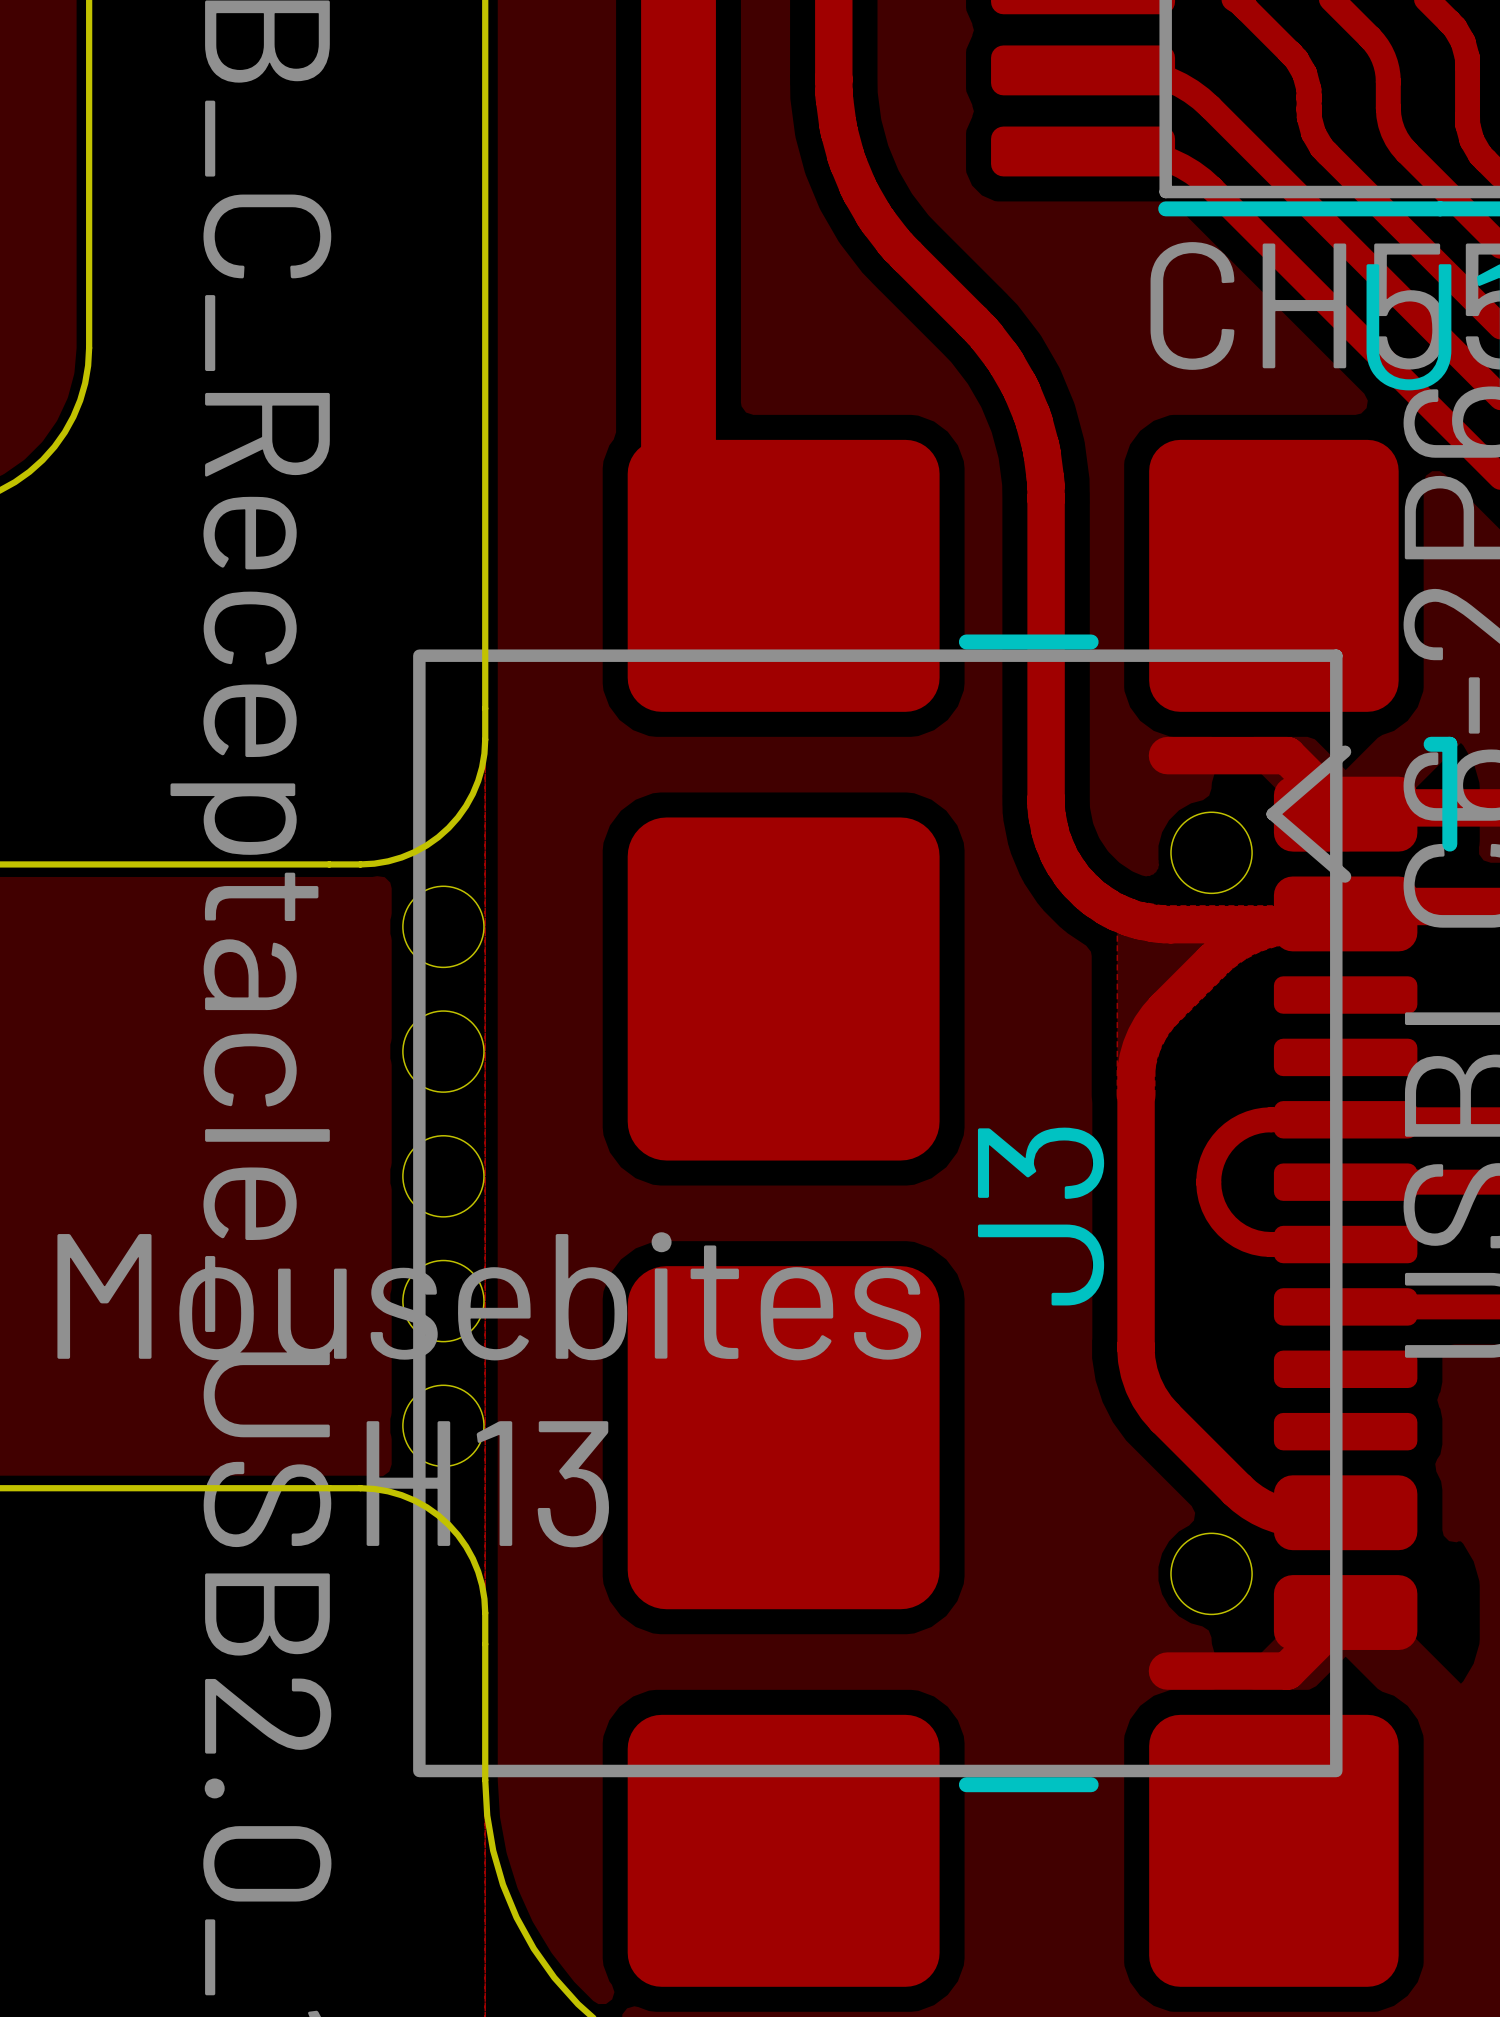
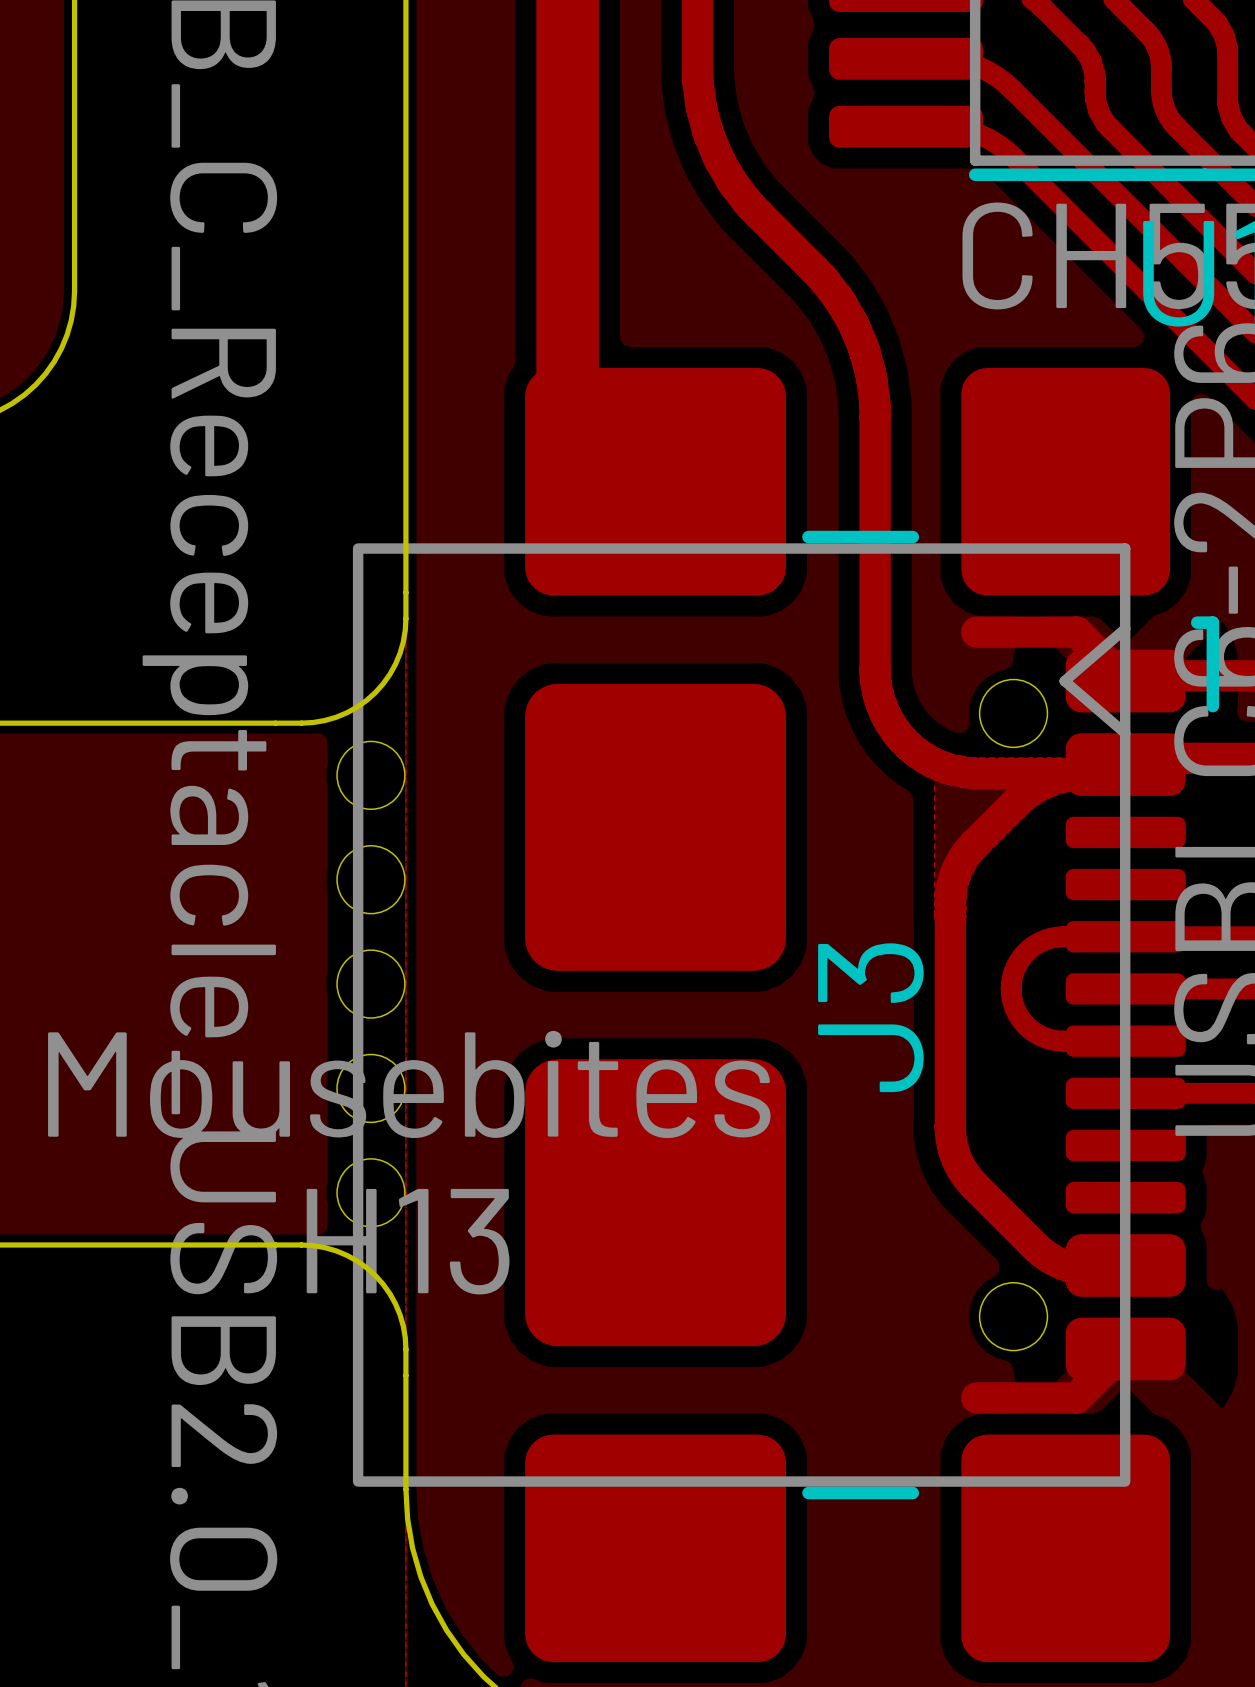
J3 footprint: [413, 439, 1458, 1987] -> [352, 367, 1220, 1663]

